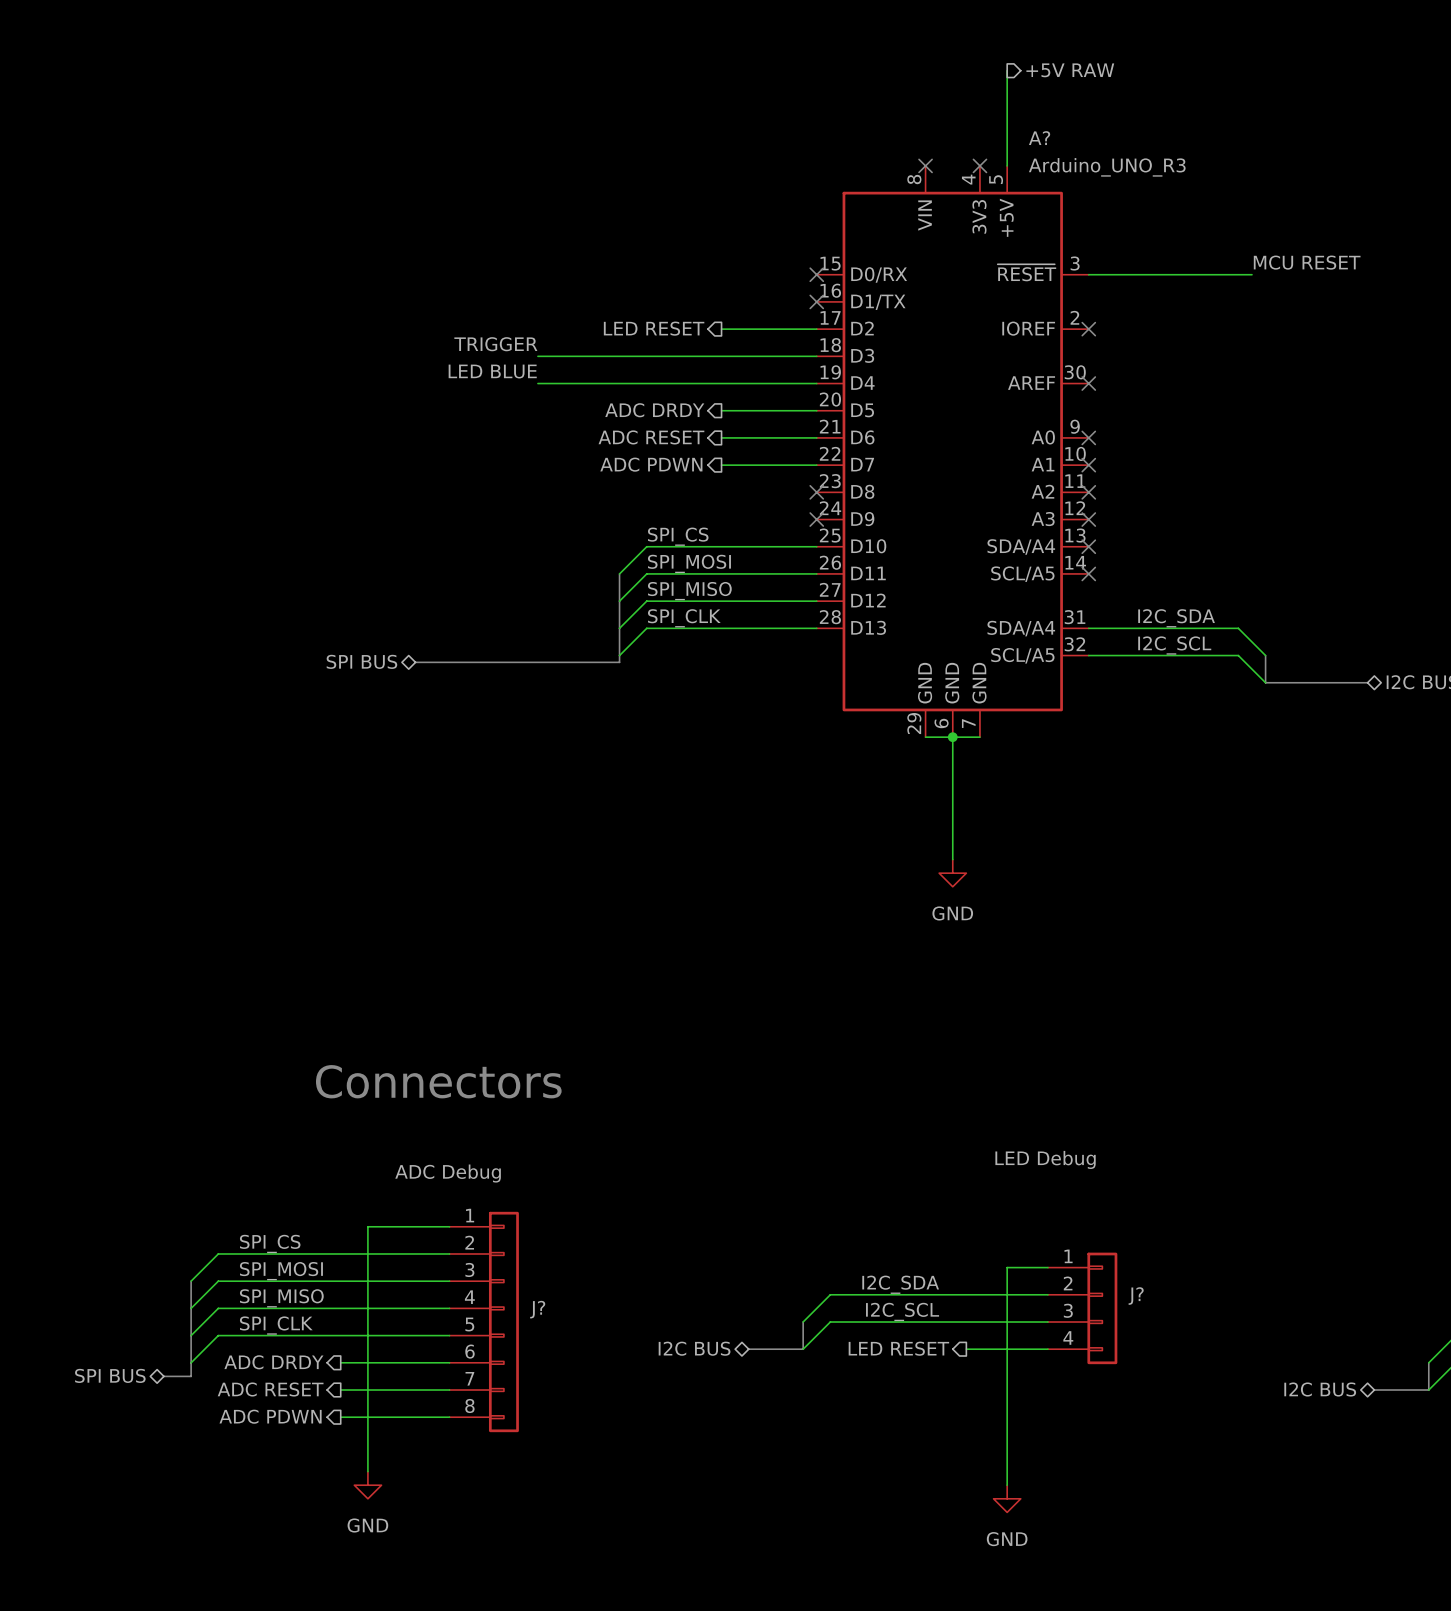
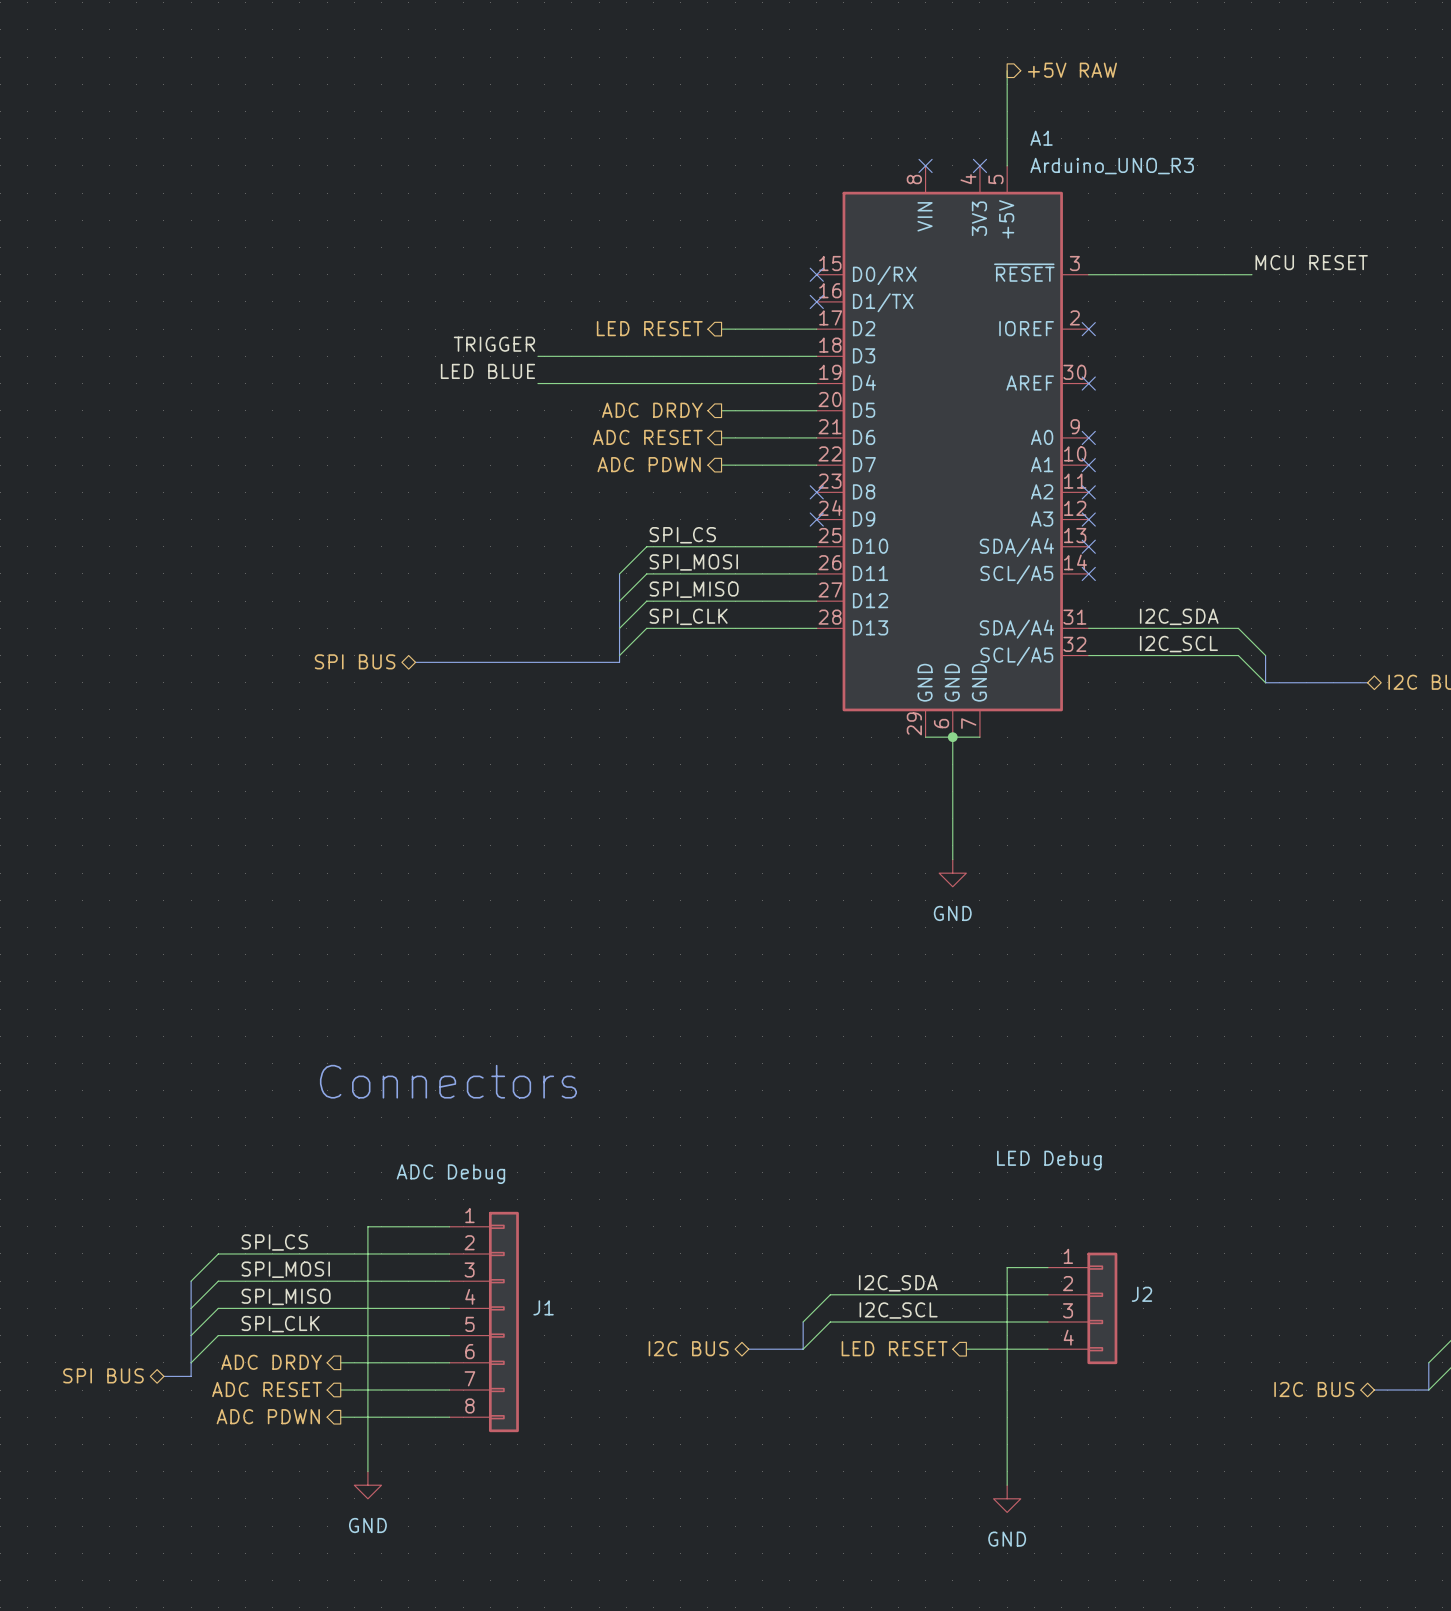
A? name: A? (1039, 138) -> A1 (1041, 138)
J? name: J? (1136, 1296) -> J2 (1141, 1294)
J? name: J? (537, 1309) -> J1 (543, 1307)

